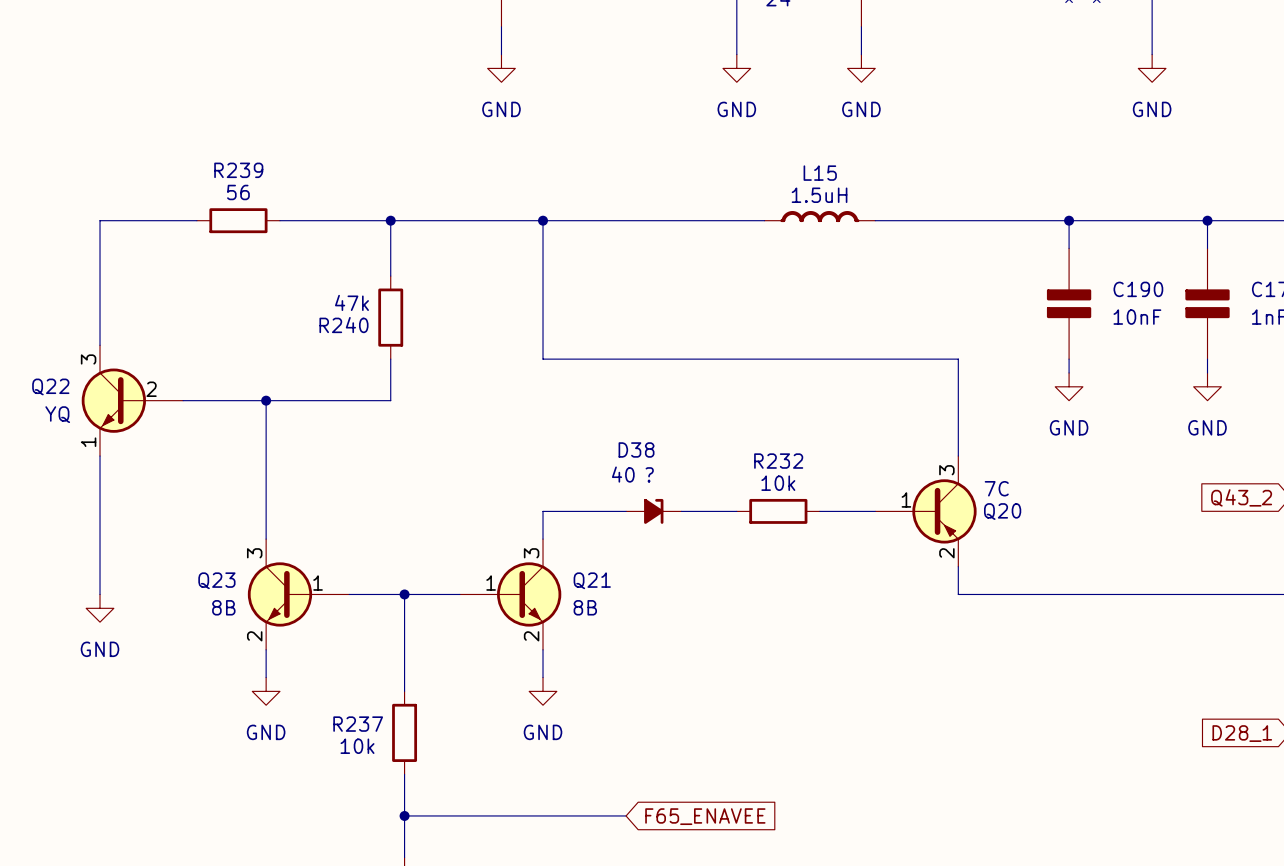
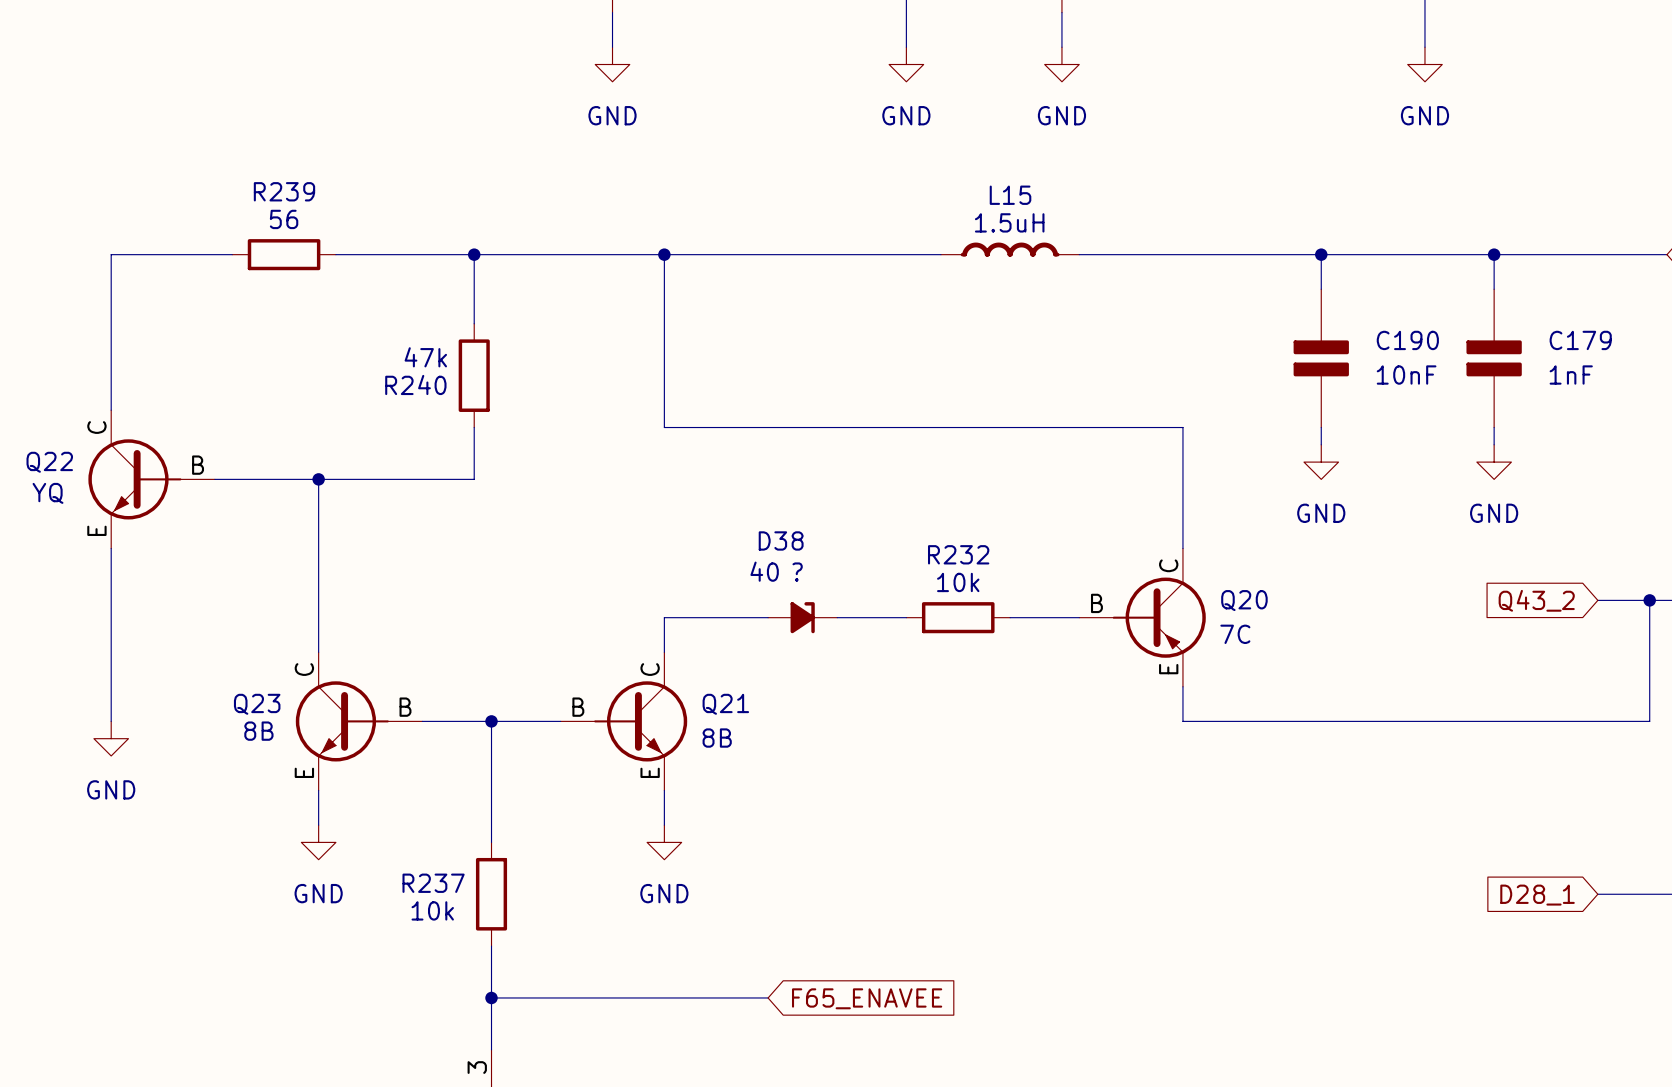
Q22 symbol: [81, 345, 184, 457] -> [88, 410, 215, 549]
Q20 symbol: [875, 456, 977, 567] -> [1079, 548, 1206, 687]
Q20 value position: 7C (996, 488) -> 7C (1235, 634)
Q23 symbol: [247, 539, 350, 650] -> [295, 652, 423, 791]
Q21 symbol: [459, 539, 562, 650] -> [560, 652, 688, 791]

